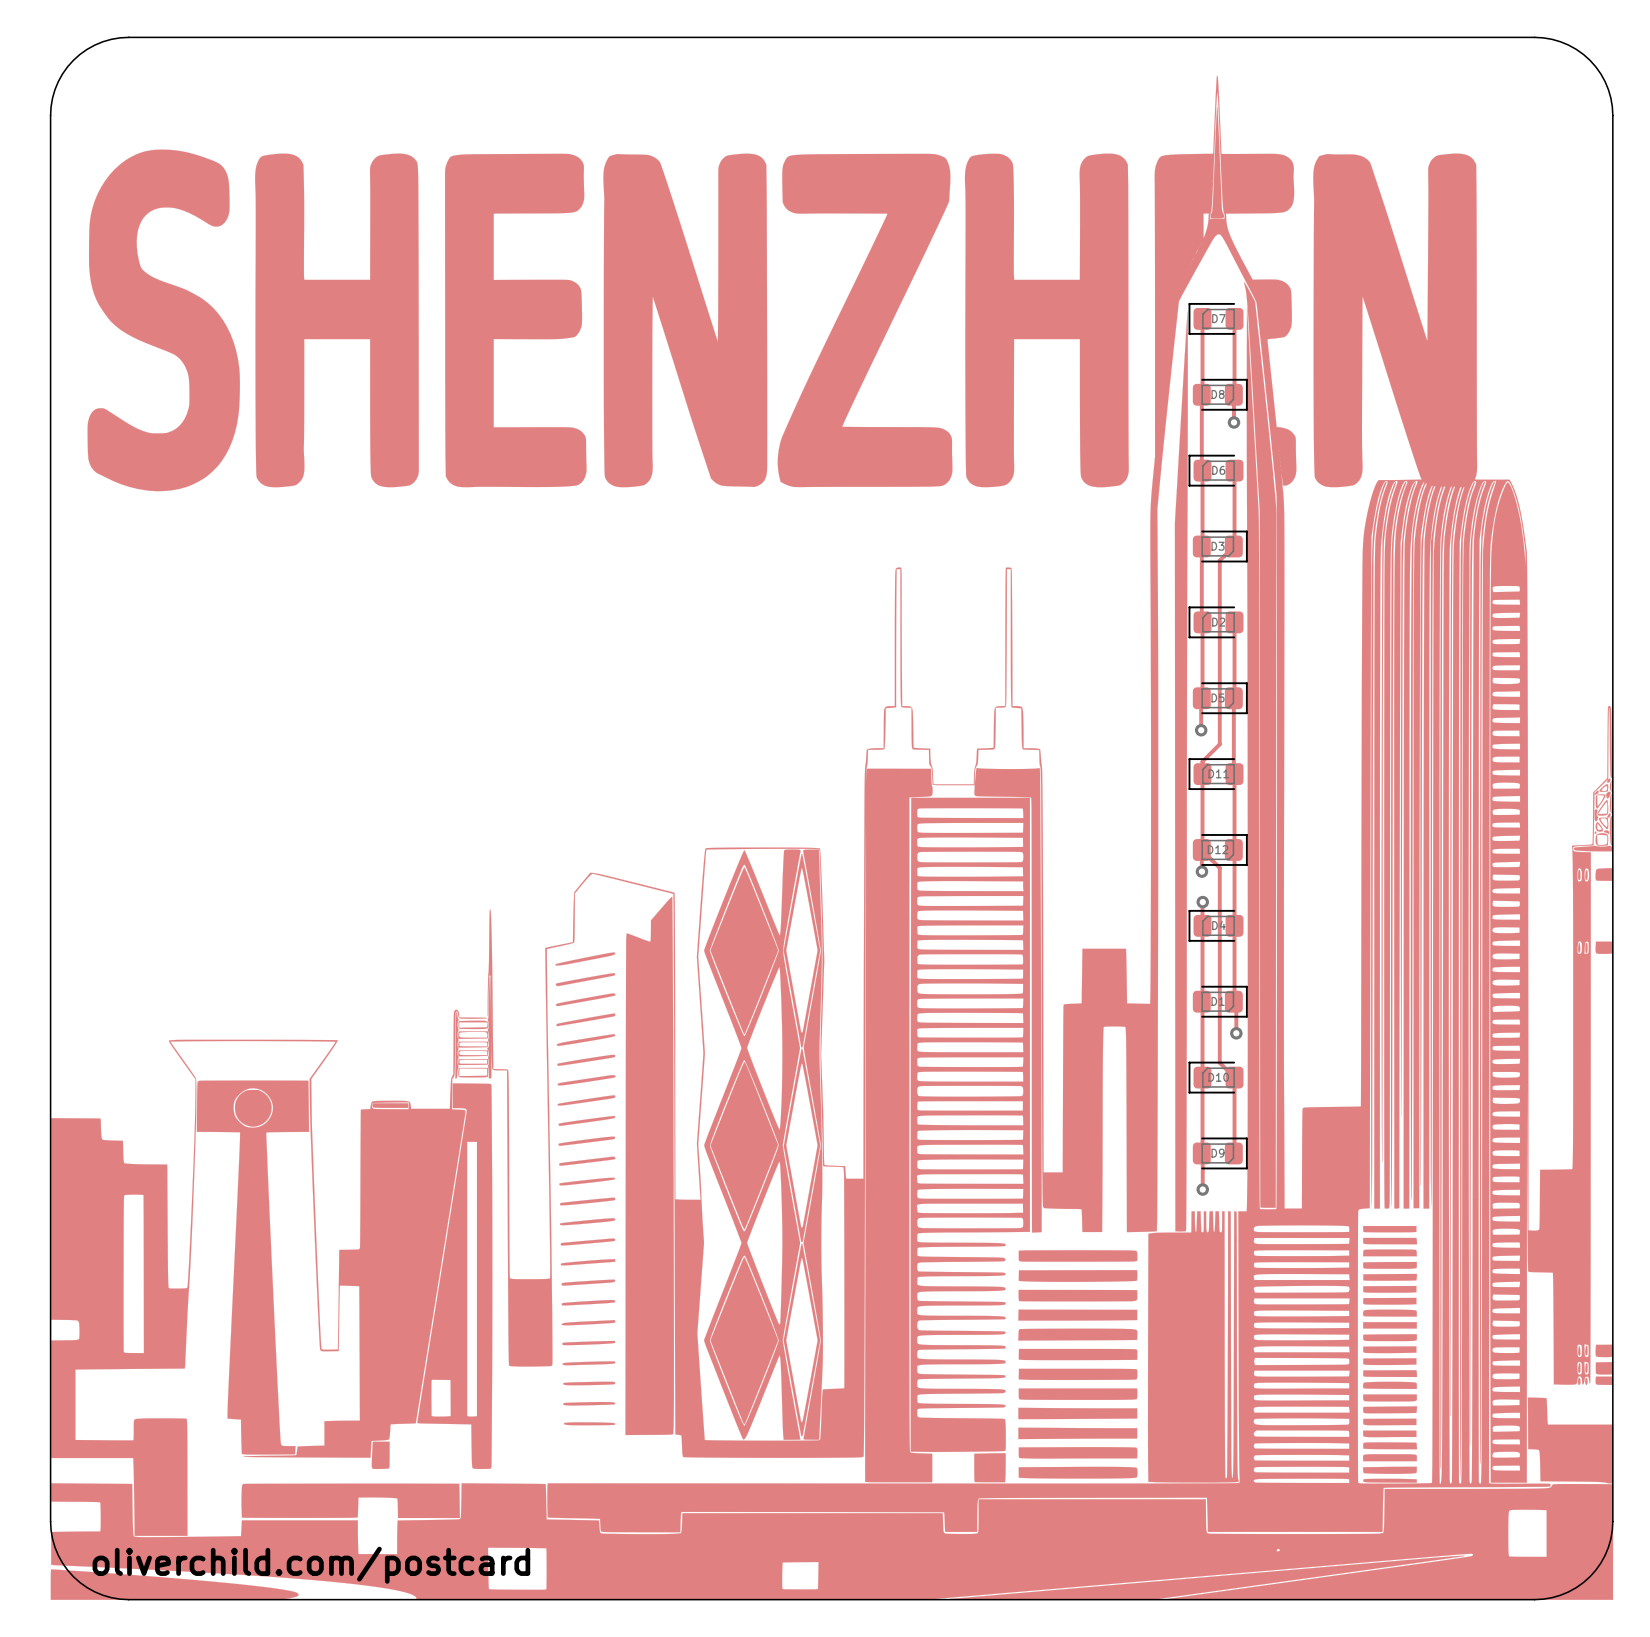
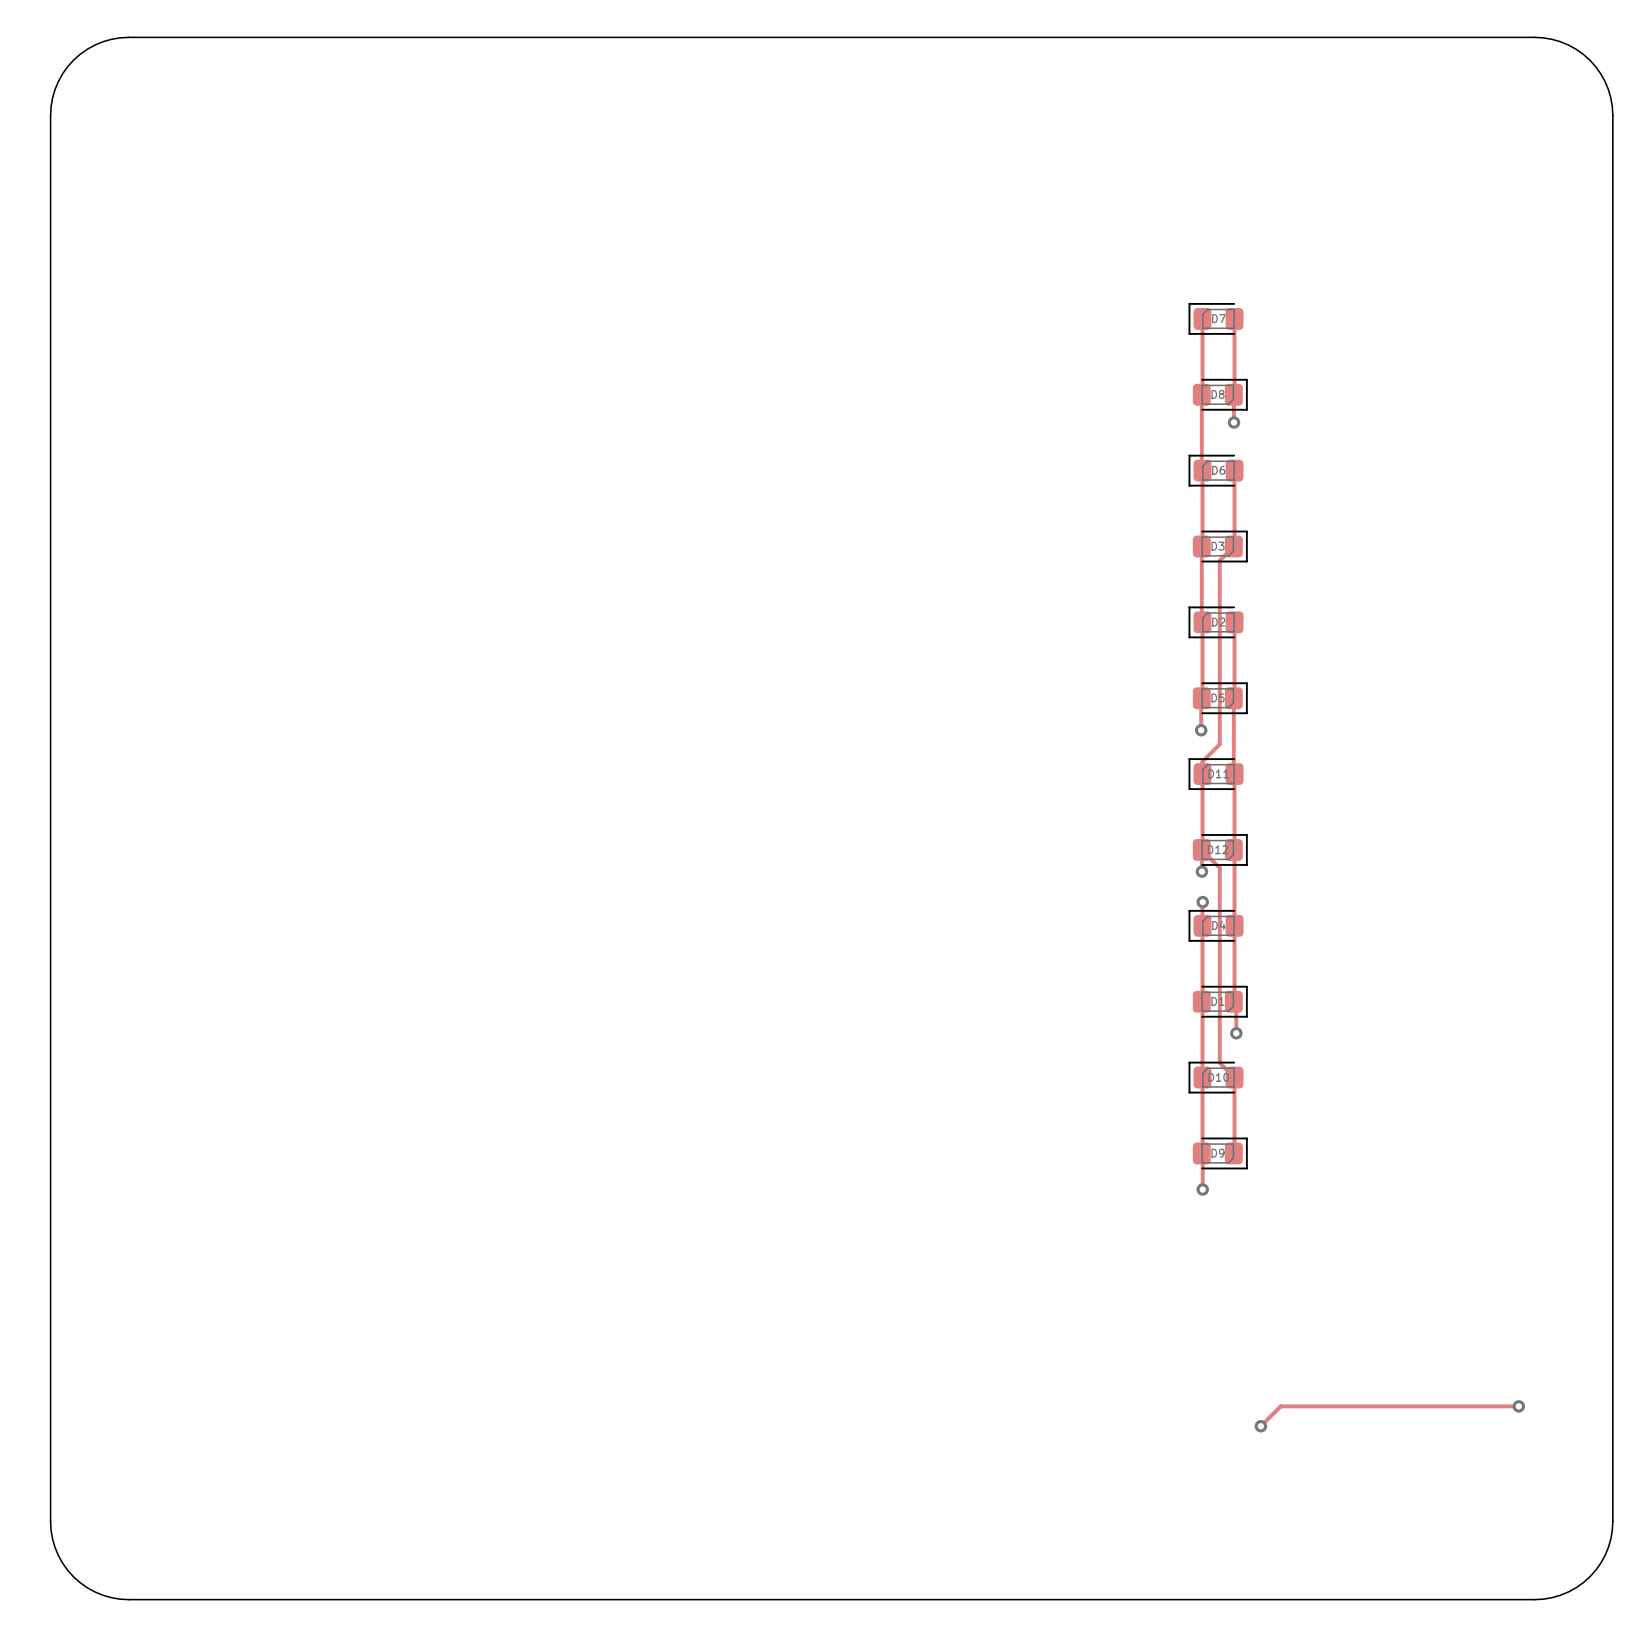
drawing: [50, 75, 1614, 1600] -> none
track: none -> (1518, 1406) (1280, 1406) (1260, 1426)
via: none -> (1518, 1406)
via: none -> (1260, 1426)
text: oliverchild.com/postcard (311, 1565) -> none

